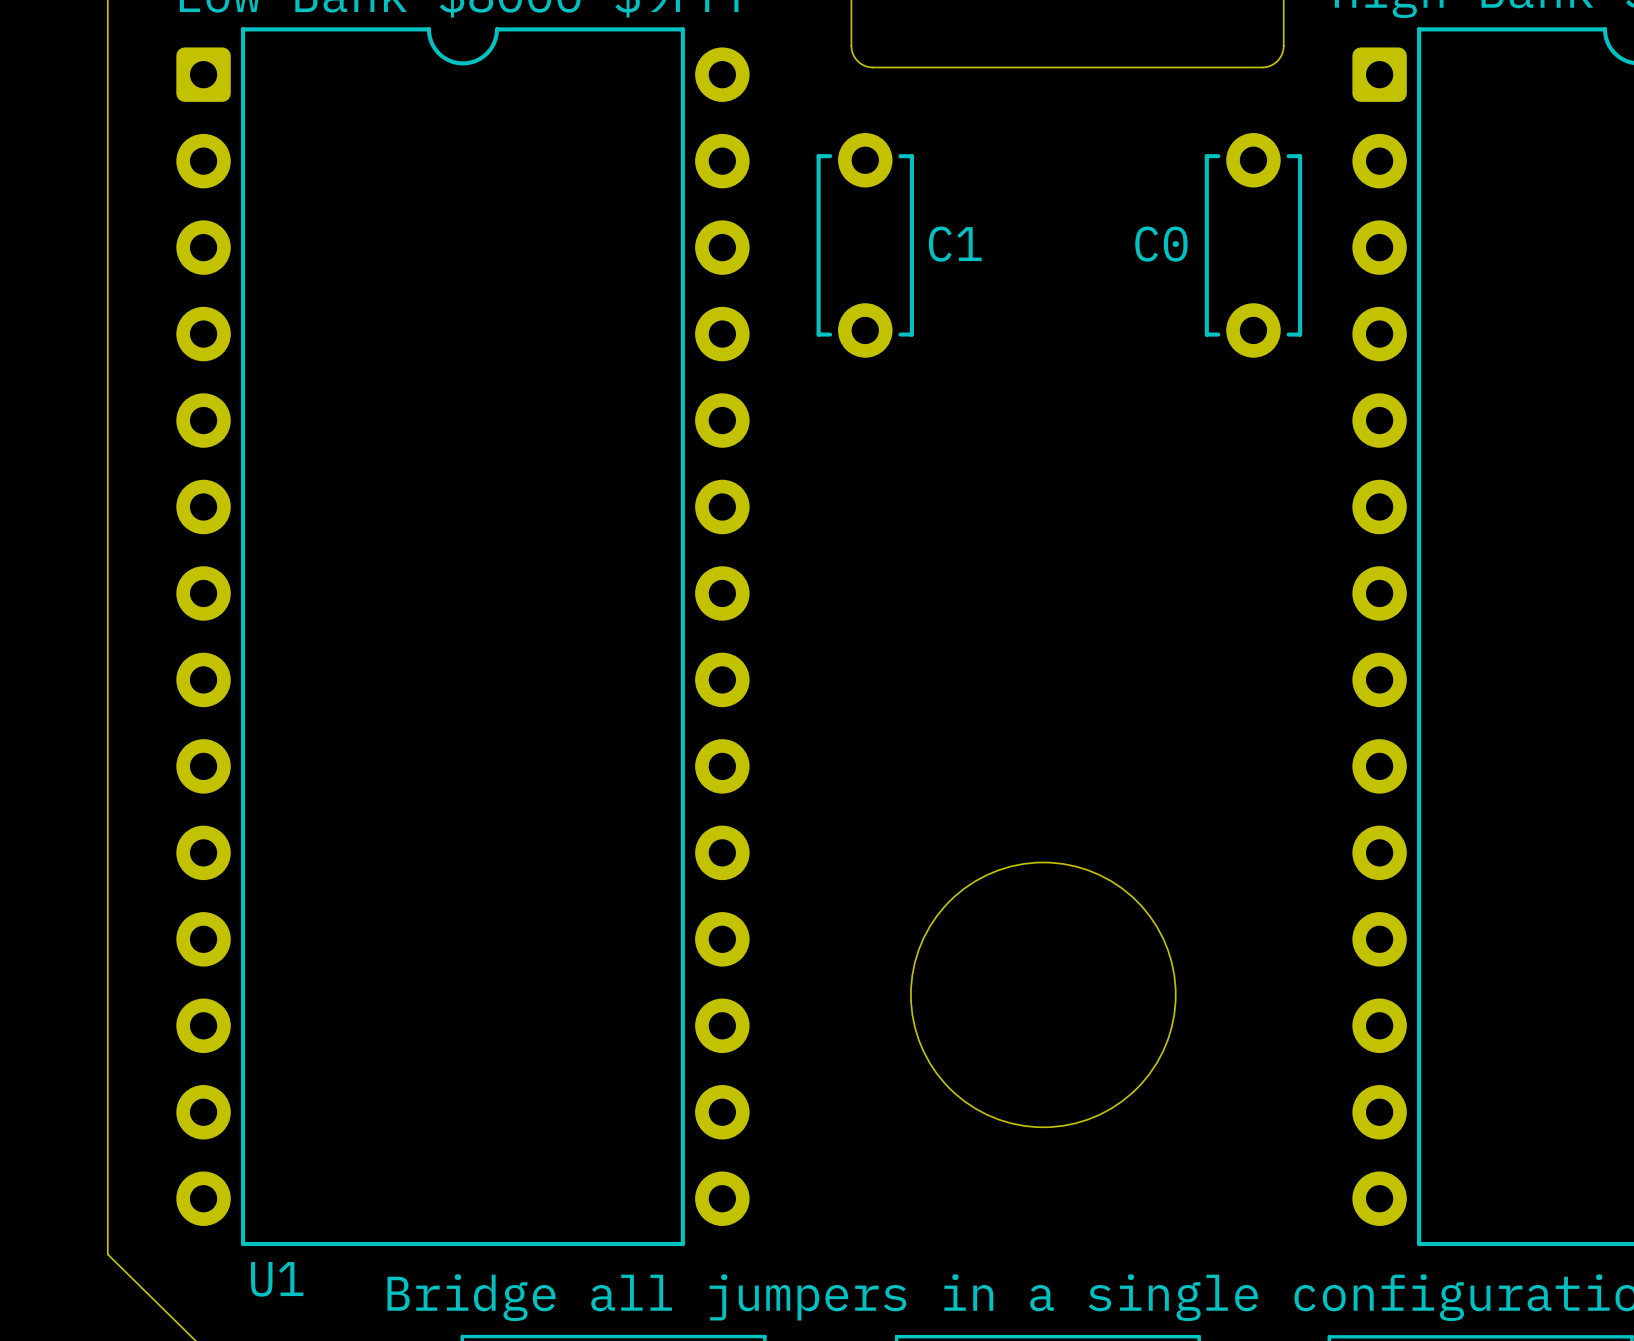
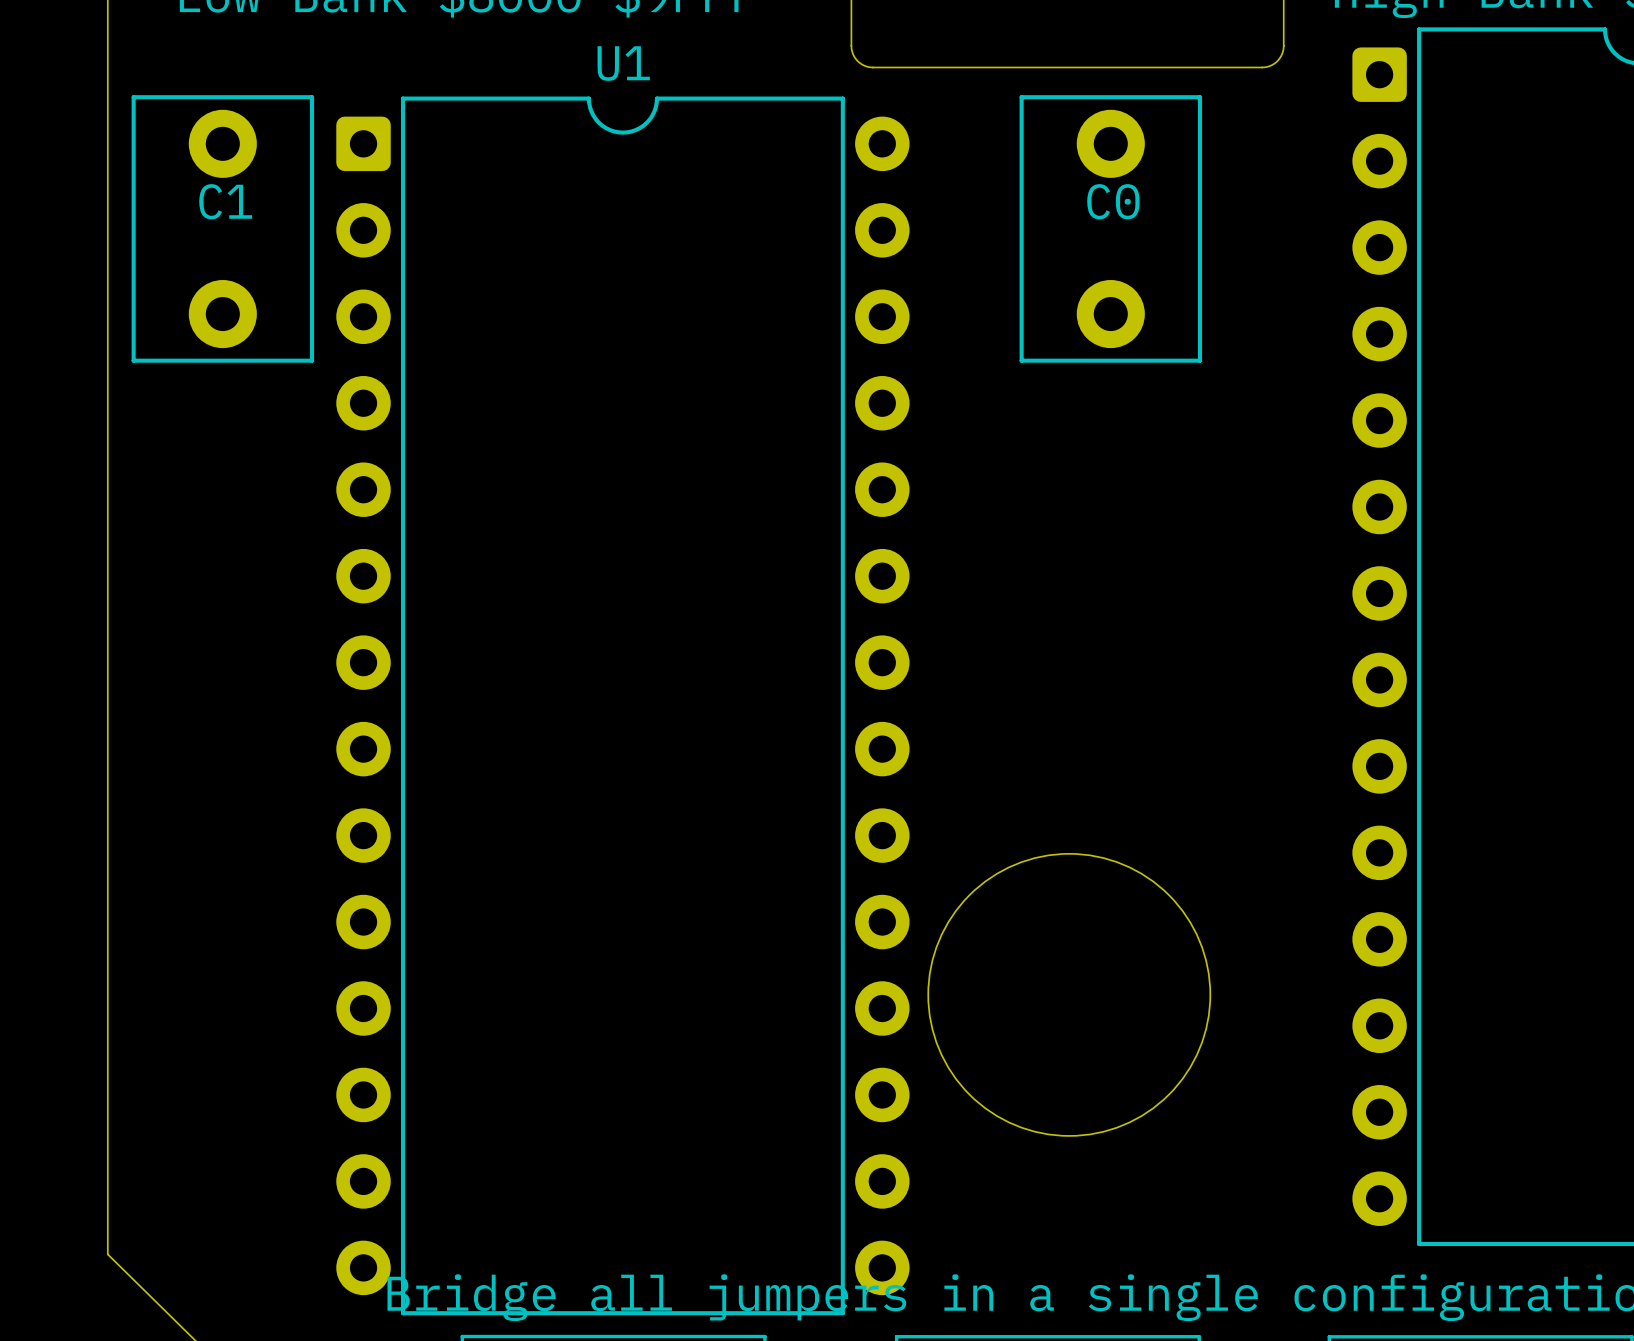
C1 footprint: [816, 133, 914, 358] -> [131, 95, 315, 363]
C0 footprint: [1204, 133, 1303, 358] -> [1019, 95, 1203, 363]
C1 name position: C1 (955, 244) -> C1 (225, 201)
C0 name position: C0 (1161, 244) -> C0 (1113, 201)
U1 position: (462, 636) -> (622, 705)
round board edge size: [910, 861, 1177, 1129] -> [927, 853, 1212, 1137]
U1 name position: U1 (277, 1279) -> U1 (623, 63)

